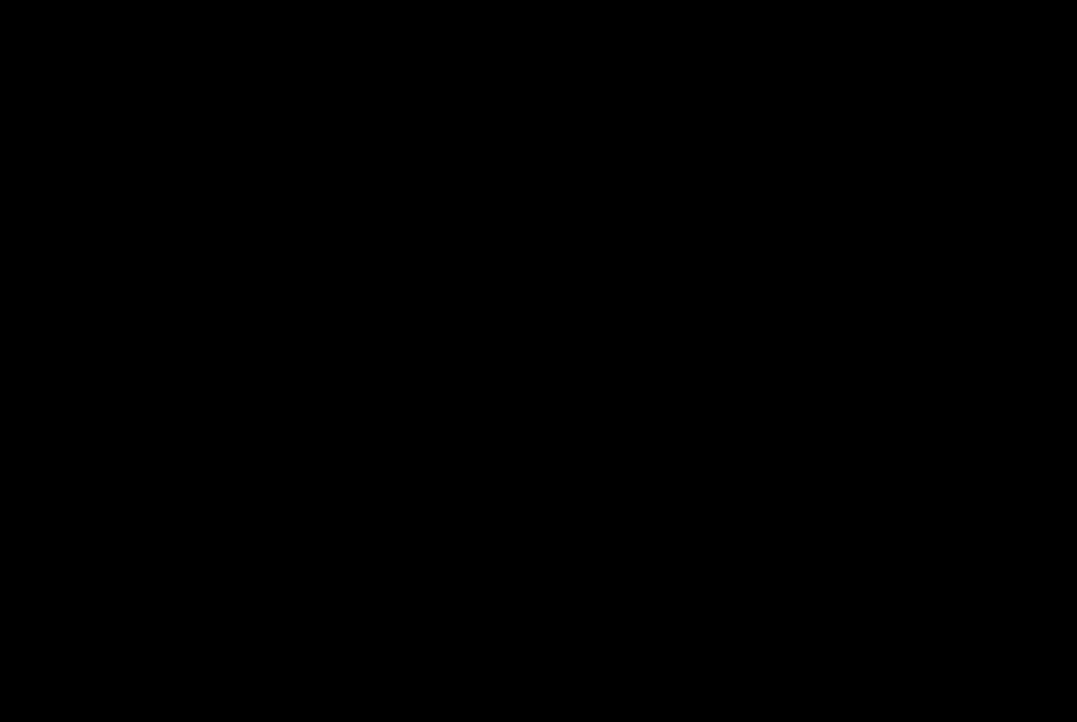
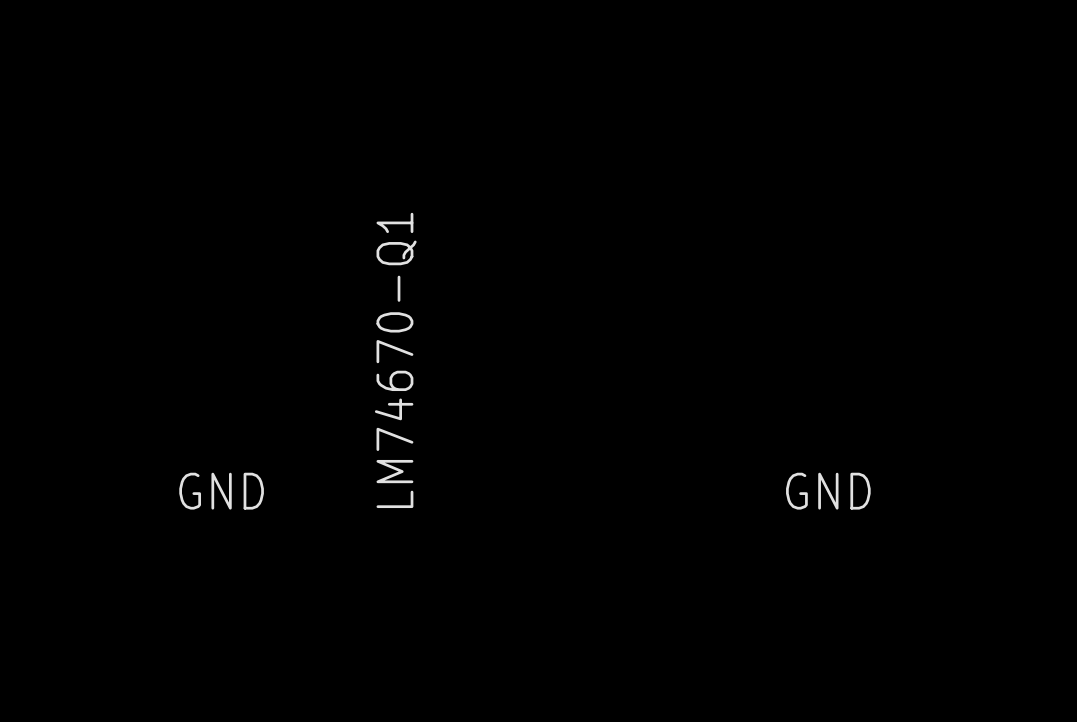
text: none -> LM74670-Q1 (395, 360)
text: none -> GND (221, 491)
text: none -> GND (828, 491)

